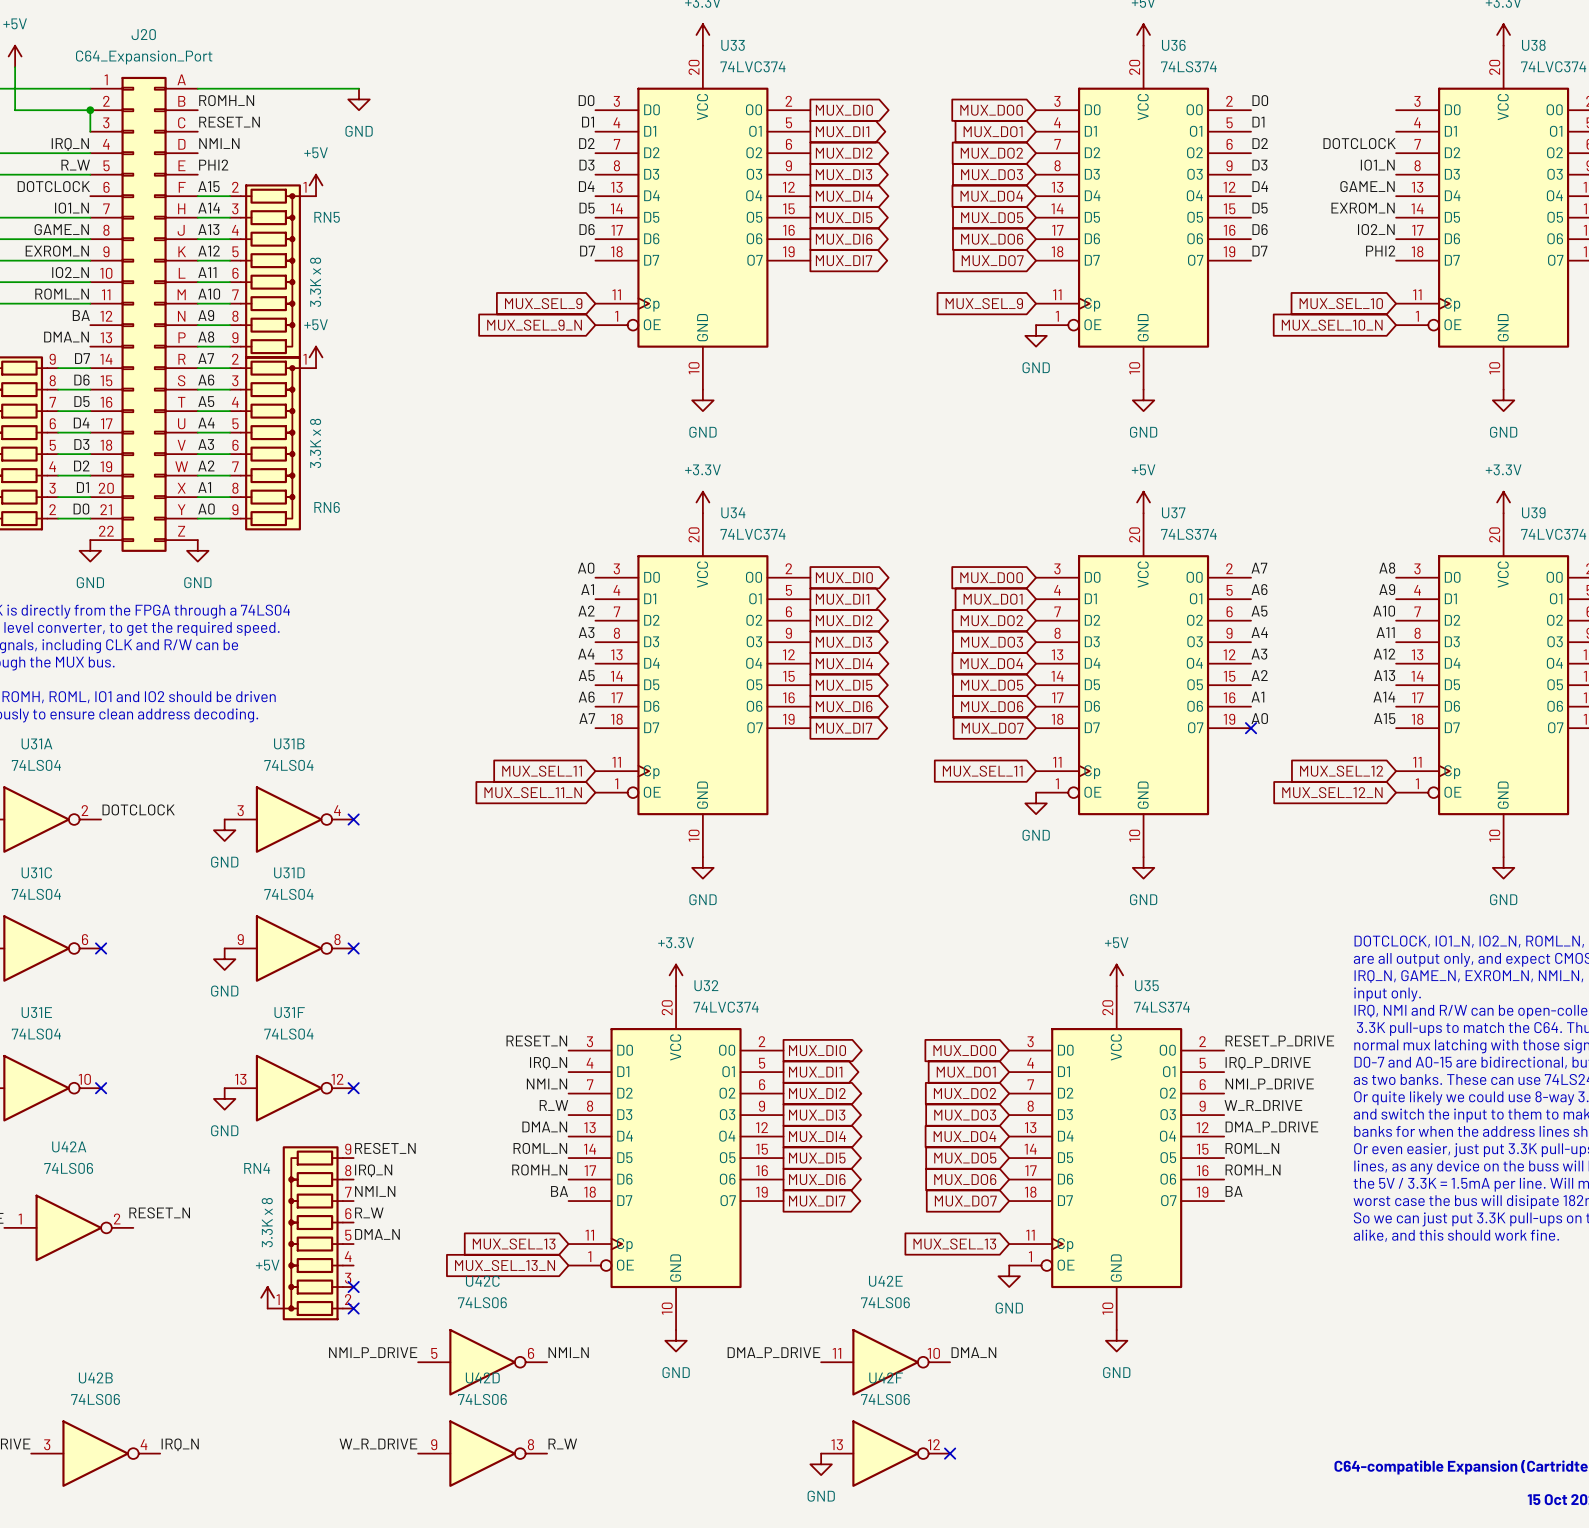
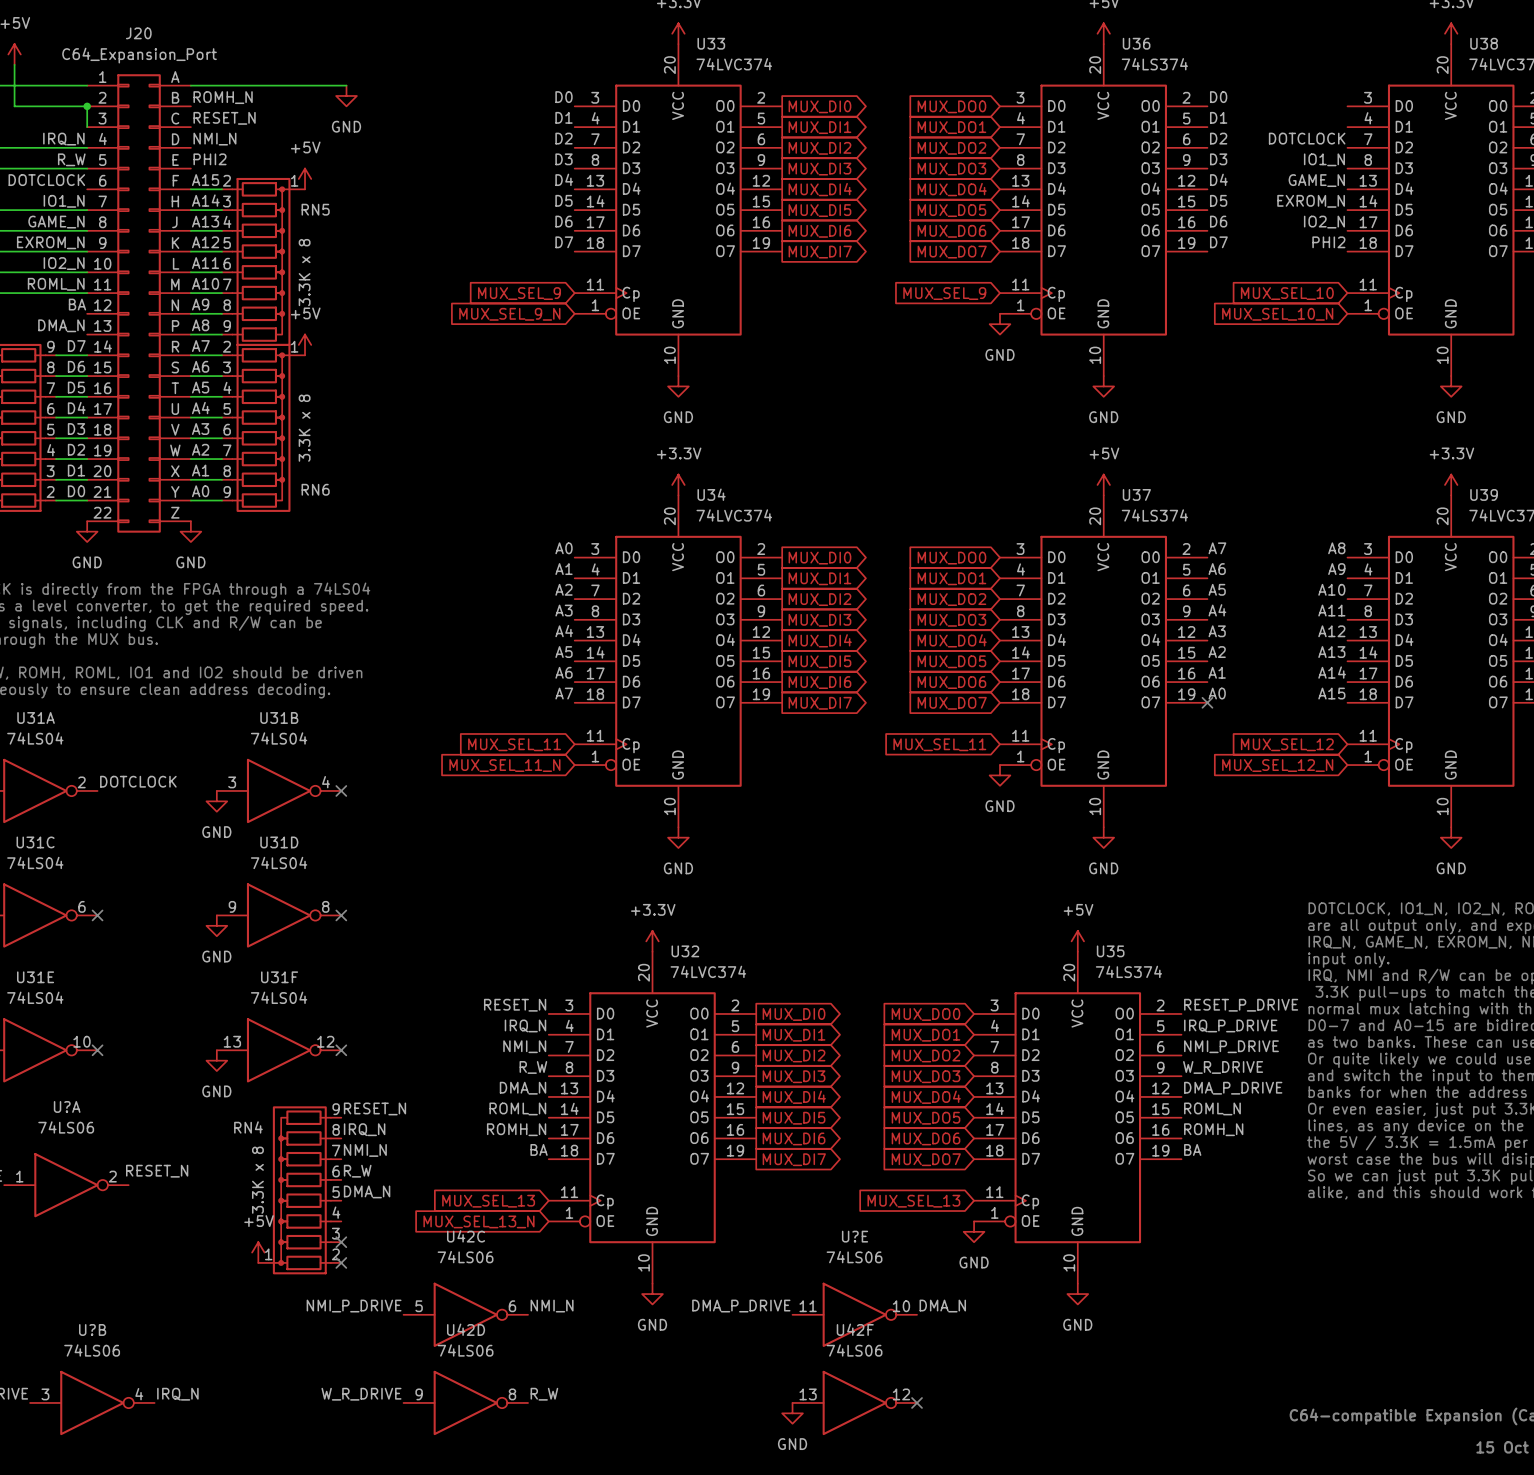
U42A name: U42A (69, 1146) -> U?A (67, 1106)
U42E name: U42E (885, 1281) -> U?E (855, 1236)
U42B name: U42B (95, 1377) -> U?B (92, 1329)

